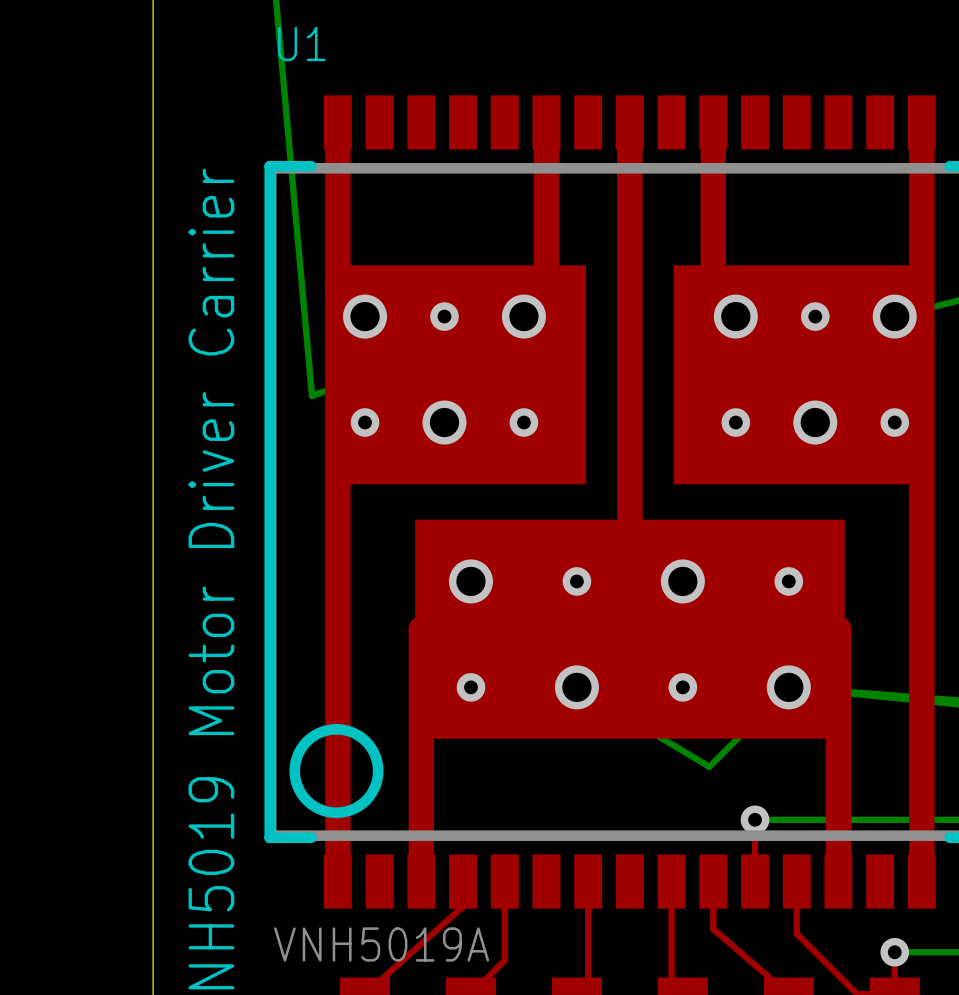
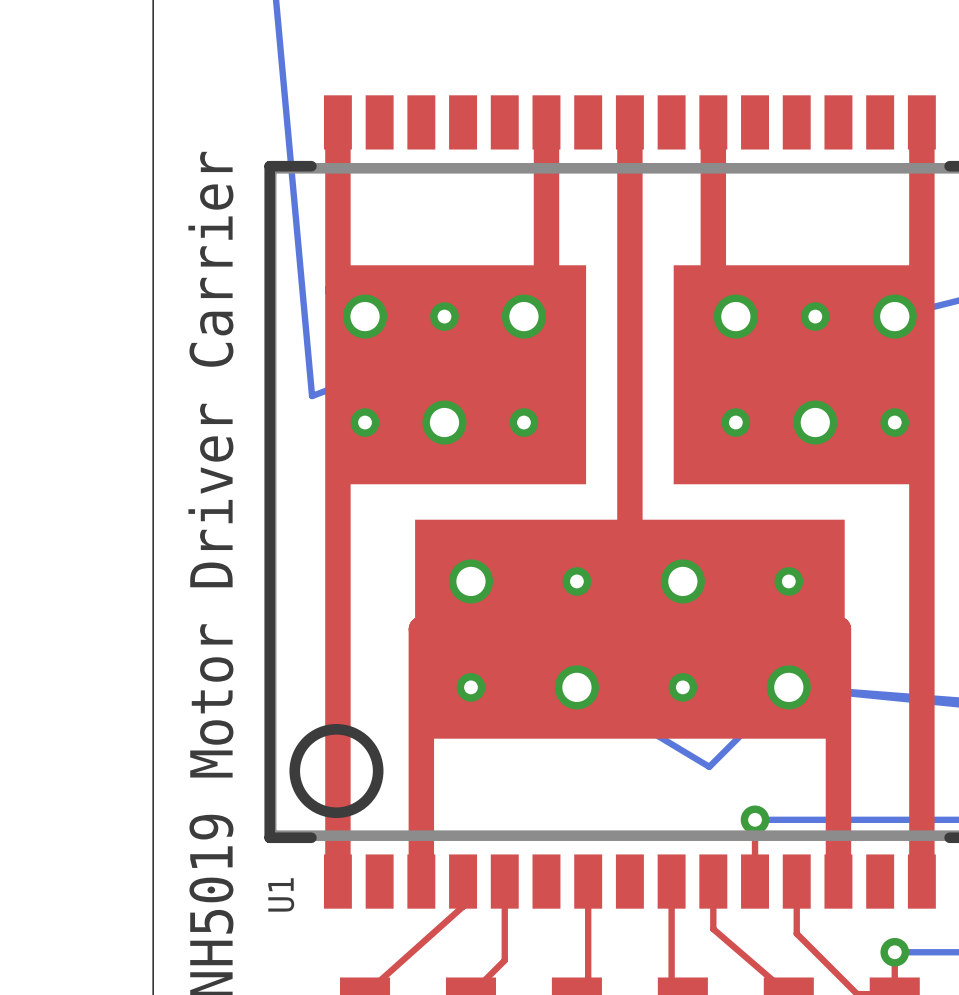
U1 name rotation: 0° (301, 43) -> 90° counterclockwise (281, 894)
U1 name position: U1 (301, 43) -> U1 (281, 894)
U1 value: VNH5019A (381, 944) -> none

